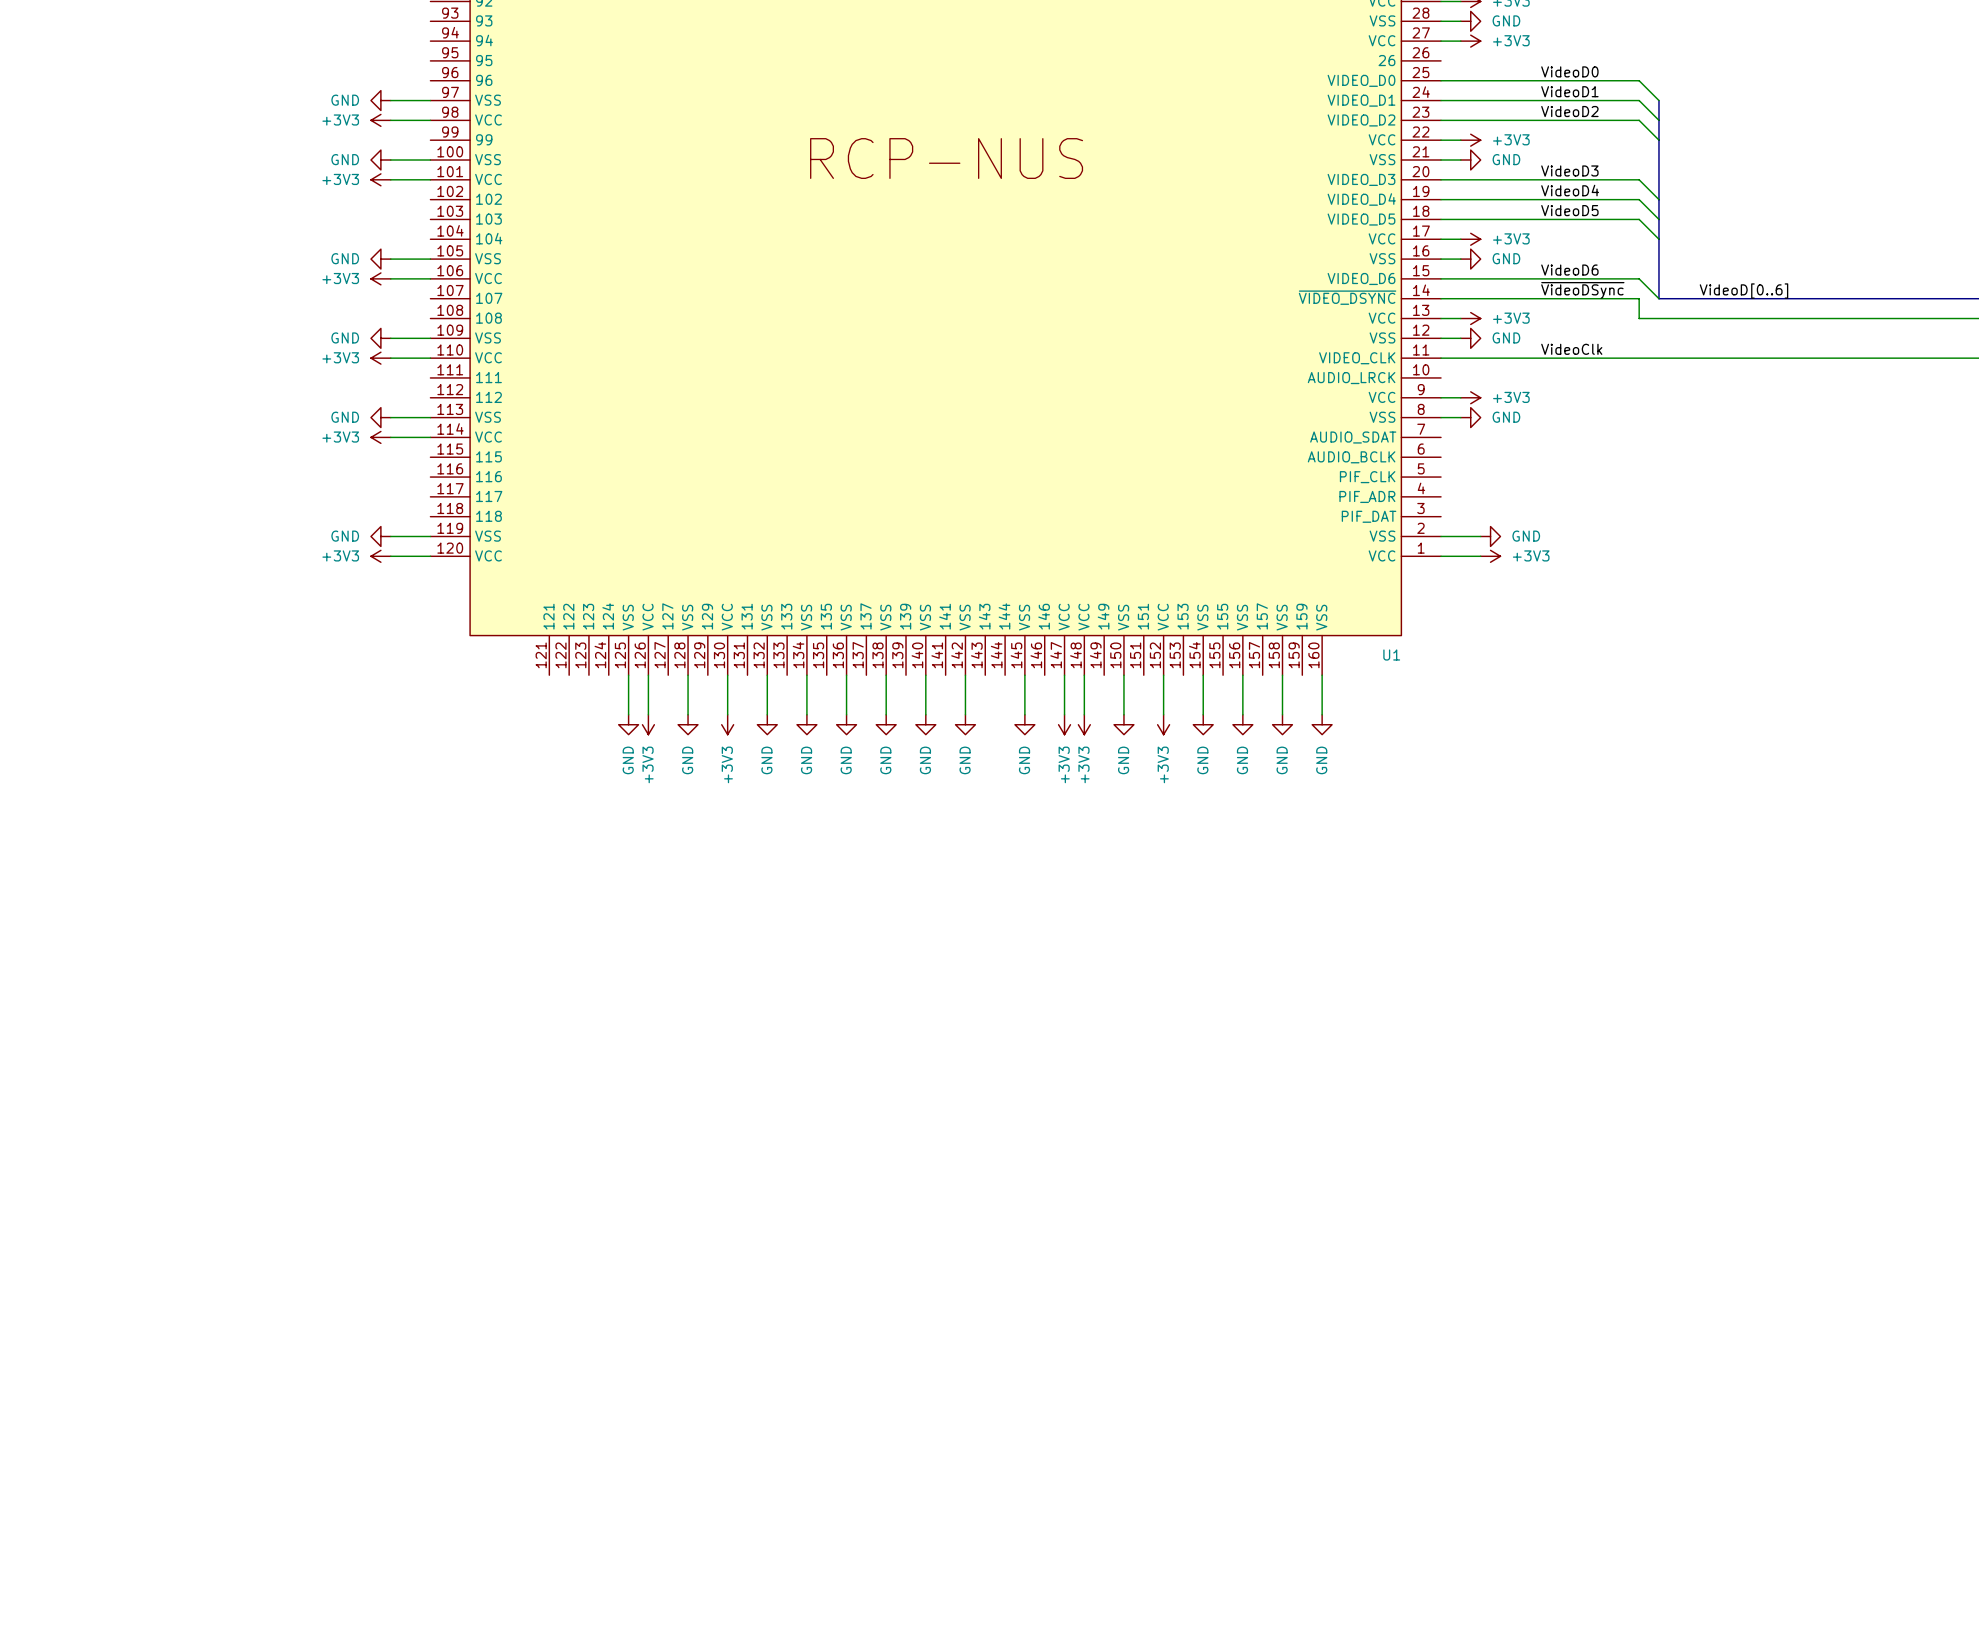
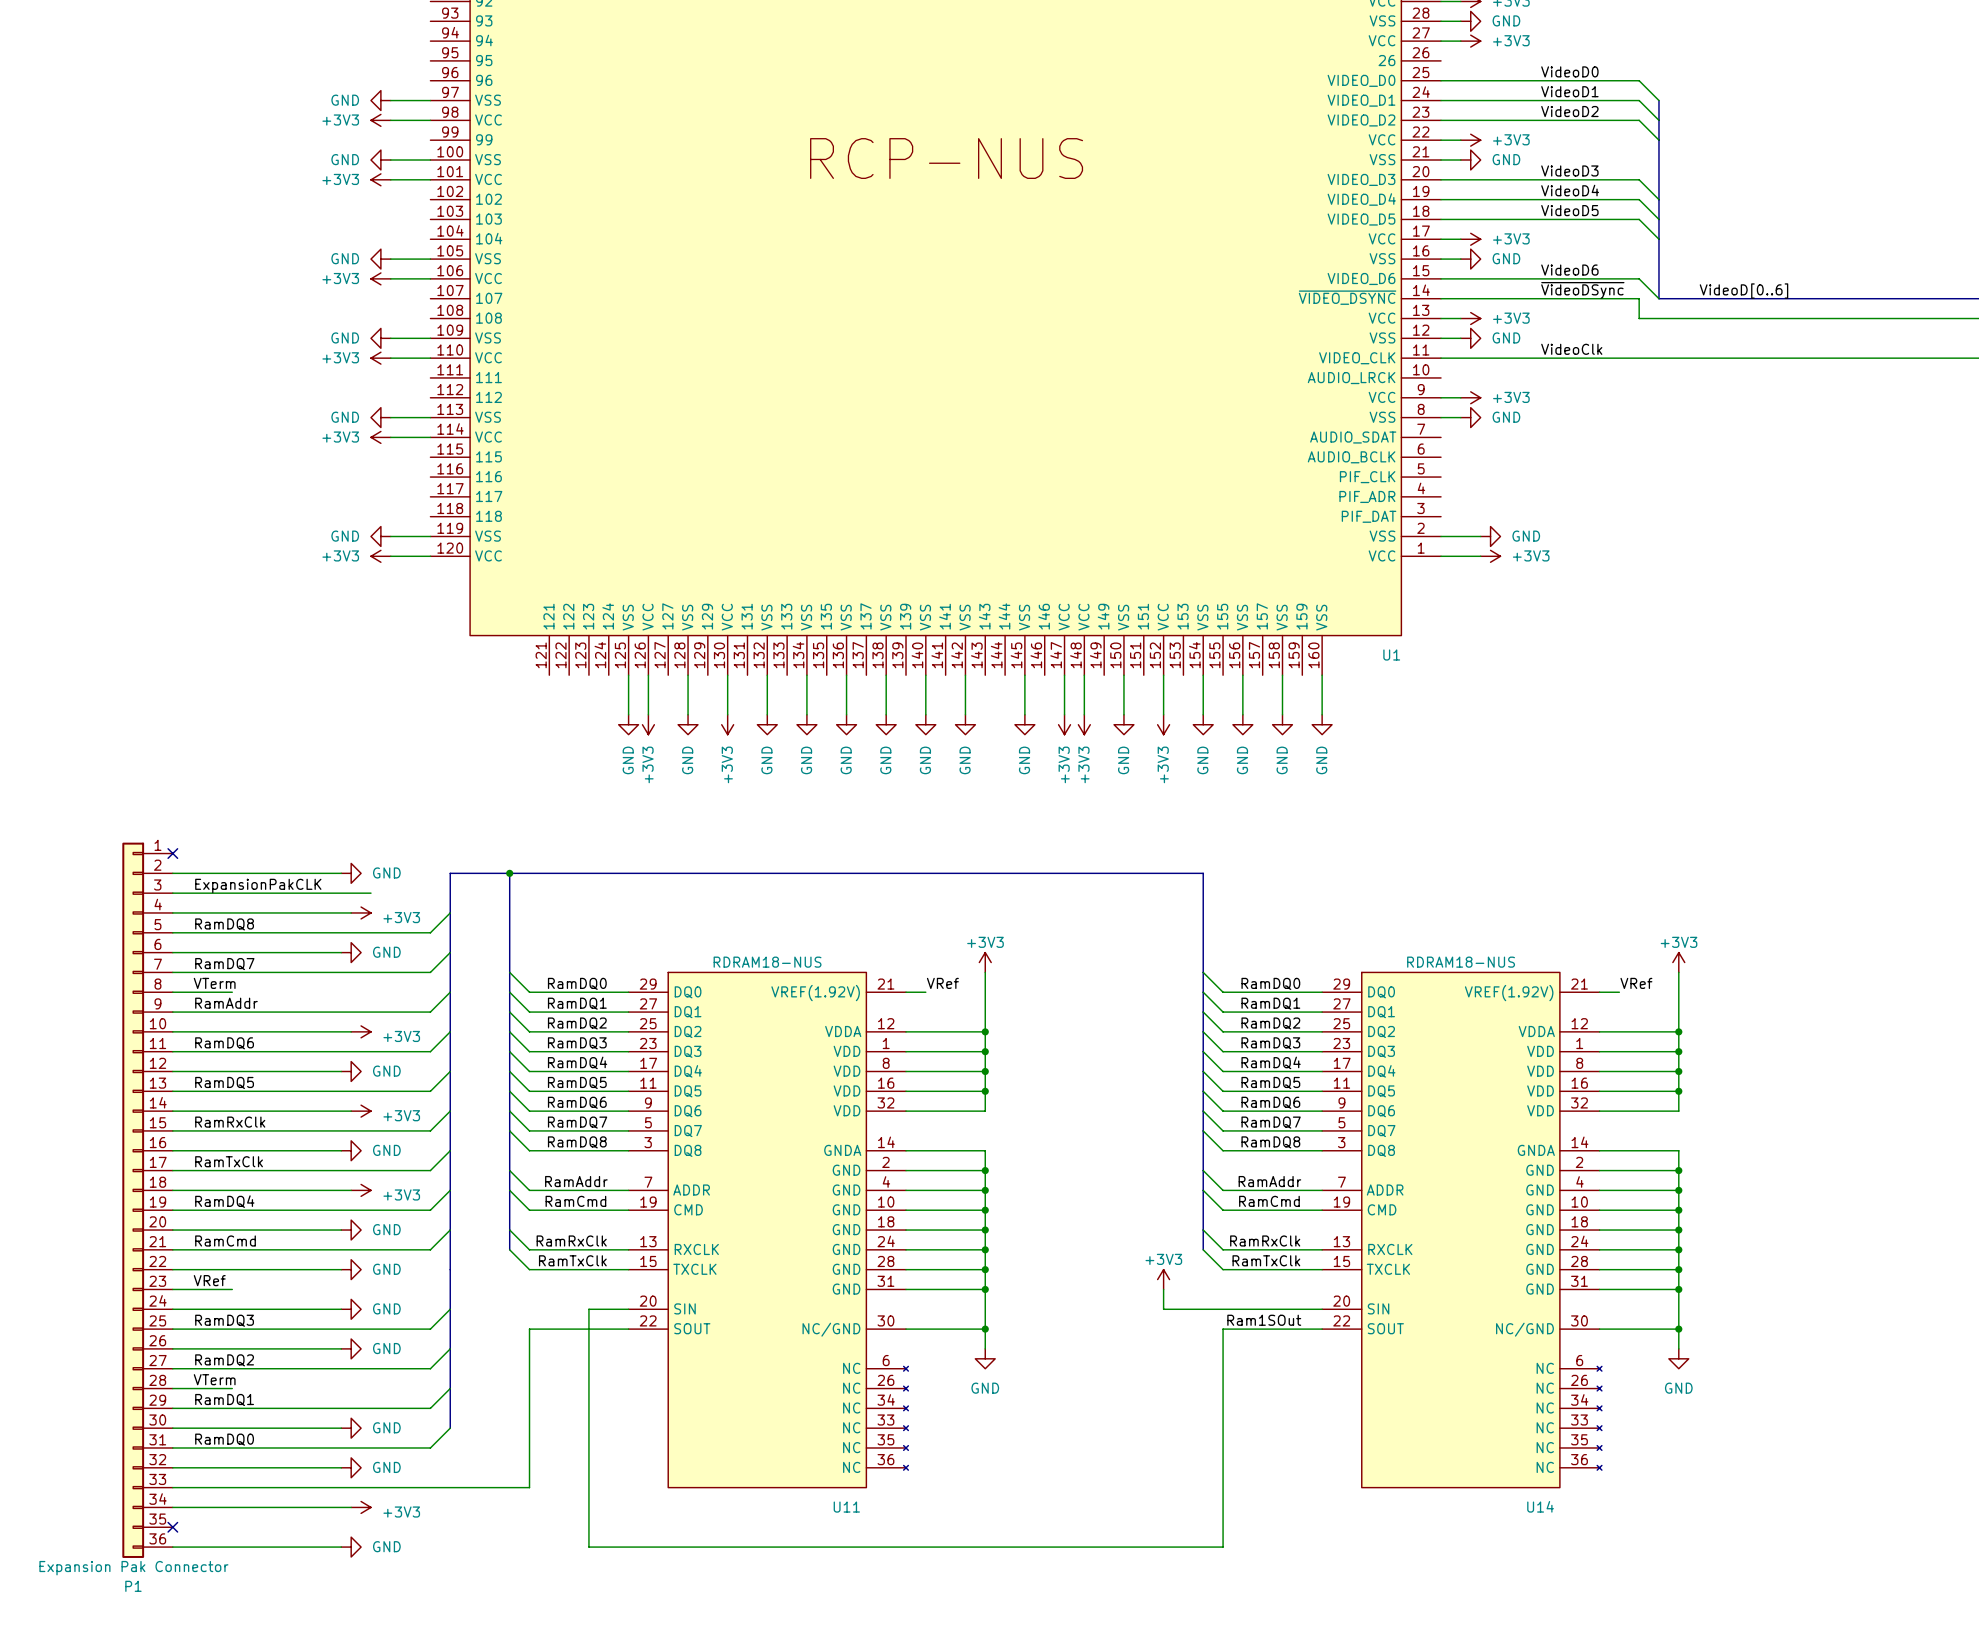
no-connect mark: none -> (172, 853)
wire: none -> (172, 873) (341, 873)
power symbol: none -> GND (351, 873)
bus: none -> (509, 873) (509, 1249)
junction: none -> (509, 873)
label: none -> ExpansionPakCLK (258, 885)
wire: none -> (172, 893) (370, 893)
wire: none -> (172, 912) (351, 912)
power symbol: none -> +3V3 (361, 912)
wire: none -> (450, 912) (430, 932) (172, 932)
label: none -> RamDQ8 (224, 924)
wire: none -> (172, 952) (341, 952)
power symbol: none -> GND (351, 952)
wire: none -> (450, 952) (430, 972) (172, 972)
power symbol: none -> +3V3 (985, 962)
power symbol: none -> +3V3 (1678, 962)
label: none -> RamDQ7 (224, 964)
wire: none -> (509, 972) (529, 992) (628, 992)
wire: none -> (985, 972) (985, 1111) (906, 1111)
wire: none -> (1203, 972) (1223, 992) (1322, 992)
wire: none -> (1678, 972) (1678, 1111) (1599, 1111)
label: none -> VTerm (214, 983)
label: none -> RamDQ0 (577, 983)
label: none -> VRef (942, 983)
label: none -> RamDQ0 (1270, 983)
label: none -> VRef (1636, 983)
wire: none -> (172, 992) (232, 992)
wire: none -> (450, 992) (430, 1012) (172, 1012)
wire: none -> (509, 992) (529, 1012) (628, 1012)
wire: none -> (906, 992) (925, 992)
wire: none -> (1203, 992) (1223, 1012) (1322, 1012)
wire: none -> (1599, 992) (1619, 992)
label: none -> RamAddr (226, 1003)
label: none -> RamDQ1 (577, 1003)
label: none -> RamDQ1 (1270, 1003)
wire: none -> (509, 1012) (529, 1031) (628, 1031)
wire: none -> (1203, 1012) (1223, 1031) (1322, 1031)
label: none -> RamDQ2 (577, 1023)
label: none -> RamDQ2 (1270, 1023)
wire: none -> (172, 1031) (351, 1031)
power symbol: none -> +3V3 (361, 1031)
wire: none -> (450, 1031) (430, 1051) (172, 1051)
wire: none -> (509, 1031) (529, 1051) (628, 1051)
wire: none -> (906, 1031) (985, 1031)
junction: none -> (985, 1031)
wire: none -> (1203, 1031) (1223, 1051) (1322, 1051)
wire: none -> (1599, 1031) (1678, 1031)
junction: none -> (1678, 1031)
label: none -> RamDQ6 (224, 1043)
label: none -> RamDQ3 (577, 1043)
label: none -> RamDQ3 (1270, 1043)
wire: none -> (509, 1051) (529, 1071) (628, 1071)
wire: none -> (906, 1051) (985, 1051)
junction: none -> (985, 1051)
wire: none -> (1203, 1051) (1223, 1071) (1322, 1071)
wire: none -> (1599, 1051) (1678, 1051)
junction: none -> (1678, 1051)
label: none -> RamDQ4 (577, 1062)
label: none -> RamDQ4 (1271, 1062)
wire: none -> (172, 1071) (341, 1071)
power symbol: none -> GND (351, 1071)
wire: none -> (450, 1071) (430, 1091) (172, 1091)
wire: none -> (509, 1071) (529, 1091) (628, 1091)
wire: none -> (906, 1071) (985, 1071)
junction: none -> (985, 1071)
wire: none -> (1203, 1071) (1223, 1091) (1322, 1091)
wire: none -> (1599, 1071) (1678, 1071)
junction: none -> (1678, 1071)
label: none -> RamDQ5 (224, 1082)
label: none -> RamDQ5 (577, 1082)
label: none -> RamDQ5 (1270, 1082)
wire: none -> (509, 1091) (529, 1111) (628, 1111)
wire: none -> (906, 1091) (985, 1091)
junction: none -> (985, 1091)
wire: none -> (1203, 1091) (1223, 1111) (1322, 1111)
wire: none -> (1599, 1091) (1678, 1091)
junction: none -> (1678, 1091)
label: none -> RamDQ6 (577, 1102)
label: none -> RamDQ6 (1270, 1102)
wire: none -> (172, 1111) (351, 1111)
power symbol: none -> +3V3 (361, 1111)
wire: none -> (450, 1111) (430, 1130) (172, 1130)
wire: none -> (509, 1111) (529, 1130) (628, 1130)
wire: none -> (1203, 1111) (1223, 1130) (1322, 1130)
label: none -> RamRxClk (230, 1122)
label: none -> RamDQ7 (577, 1122)
label: none -> RamDQ7 (1271, 1122)
wire: none -> (509, 1130) (529, 1150) (628, 1150)
wire: none -> (1203, 1130) (1223, 1150) (1322, 1150)
label: none -> RamDQ8 (577, 1142)
label: none -> RamDQ8 (1270, 1142)
wire: none -> (172, 1150) (341, 1150)
power symbol: none -> GND (351, 1150)
wire: none -> (450, 1150) (430, 1170) (172, 1170)
wire: none -> (906, 1150) (985, 1150) (985, 1348)
wire: none -> (1599, 1150) (1678, 1150) (1678, 1348)
label: none -> RamTxClk (229, 1161)
wire: none -> (509, 1170) (529, 1190) (628, 1190)
wire: none -> (906, 1170) (985, 1170)
junction: none -> (985, 1170)
wire: none -> (1203, 1170) (1223, 1190) (1322, 1190)
wire: none -> (1599, 1170) (1678, 1170)
junction: none -> (1678, 1170)
label: none -> RamAddr (576, 1181)
label: none -> RamAddr (1269, 1181)
wire: none -> (172, 1190) (351, 1190)
power symbol: none -> +3V3 (361, 1190)
wire: none -> (450, 1190) (430, 1210) (172, 1210)
wire: none -> (509, 1190) (529, 1210) (628, 1210)
wire: none -> (906, 1190) (985, 1190)
junction: none -> (985, 1190)
wire: none -> (1203, 1190) (1223, 1210) (1322, 1210)
wire: none -> (1599, 1190) (1678, 1190)
junction: none -> (1678, 1190)
P1: none -> Expansion Pak Connector (147, 1200)
label: none -> RamDQ4 (224, 1201)
label: none -> RamCmd (575, 1201)
label: none -> RamCmd (1269, 1201)
wire: none -> (906, 1210) (985, 1210)
junction: none -> (985, 1210)
wire: none -> (1599, 1210) (1678, 1210)
junction: none -> (1678, 1210)
wire: none -> (172, 1230) (341, 1230)
power symbol: none -> GND (351, 1230)
wire: none -> (450, 1230) (430, 1249) (172, 1249)
wire: none -> (509, 1230) (529, 1249) (628, 1249)
U11: none -> RDRAM18-NUS (768, 1230)
wire: none -> (906, 1230) (985, 1230)
junction: none -> (985, 1230)
wire: none -> (1203, 1230) (1223, 1249) (1322, 1249)
U14: none -> RDRAM18-NUS (1462, 1230)
wire: none -> (1599, 1230) (1678, 1230)
junction: none -> (1678, 1230)
label: none -> RamCmd (225, 1240)
label: none -> RamRxClk (571, 1240)
label: none -> RamRxClk (1265, 1240)
wire: none -> (509, 1249) (529, 1269) (628, 1269)
wire: none -> (906, 1249) (985, 1249)
junction: none -> (985, 1249)
wire: none -> (1203, 1249) (1223, 1269) (1322, 1269)
bus: none -> (1203, 1249) (1203, 873) (450, 873) (450, 1428)
wire: none -> (1599, 1249) (1678, 1249)
junction: none -> (1678, 1249)
label: none -> RamTxClk (572, 1260)
label: none -> RamTxClk (1266, 1260)
wire: none -> (172, 1269) (341, 1269)
power symbol: none -> GND (351, 1269)
wire: none -> (906, 1269) (985, 1269)
junction: none -> (985, 1269)
wire: none -> (1599, 1269) (1678, 1269)
junction: none -> (1678, 1269)
power symbol: none -> +3V3 (1163, 1279)
label: none -> VRef (209, 1280)
wire: none -> (172, 1289) (232, 1289)
wire: none -> (906, 1289) (985, 1289)
junction: none -> (985, 1289)
wire: none -> (1163, 1289) (1163, 1309) (1322, 1309)
wire: none -> (1599, 1289) (1678, 1289)
junction: none -> (1678, 1289)
wire: none -> (172, 1309) (341, 1309)
power symbol: none -> GND (351, 1309)
wire: none -> (450, 1309) (430, 1329) (172, 1329)
wire: none -> (628, 1309) (588, 1309) (588, 1547) (1223, 1547) (1223, 1329) (1322, 1329)
label: none -> RamDQ3 (224, 1320)
label: none -> Ram1SOut (1264, 1320)
wire: none -> (628, 1329) (529, 1329) (529, 1487) (172, 1487)
wire: none -> (906, 1329) (985, 1329)
junction: none -> (985, 1329)
wire: none -> (1599, 1329) (1678, 1329)
junction: none -> (1678, 1329)
wire: none -> (172, 1348) (341, 1348)
power symbol: none -> GND (351, 1348)
wire: none -> (450, 1348) (430, 1368) (172, 1368)
power symbol: none -> GND (985, 1358)
power symbol: none -> GND (1678, 1358)
label: none -> RamDQ2 (224, 1360)
label: none -> VTerm (214, 1379)
wire: none -> (172, 1388) (232, 1388)
wire: none -> (450, 1388) (430, 1408) (172, 1408)
label: none -> RamDQ1 (224, 1399)
wire: none -> (172, 1428) (341, 1428)
power symbol: none -> GND (351, 1428)
wire: none -> (450, 1428) (430, 1447) (172, 1447)
label: none -> RamDQ0 (224, 1439)
wire: none -> (172, 1467) (341, 1467)
power symbol: none -> GND (351, 1467)
wire: none -> (172, 1507) (351, 1507)
power symbol: none -> +3V3 (361, 1507)
no-connect mark: none -> (172, 1527)
wire: none -> (172, 1547) (341, 1547)
power symbol: none -> GND (351, 1547)

